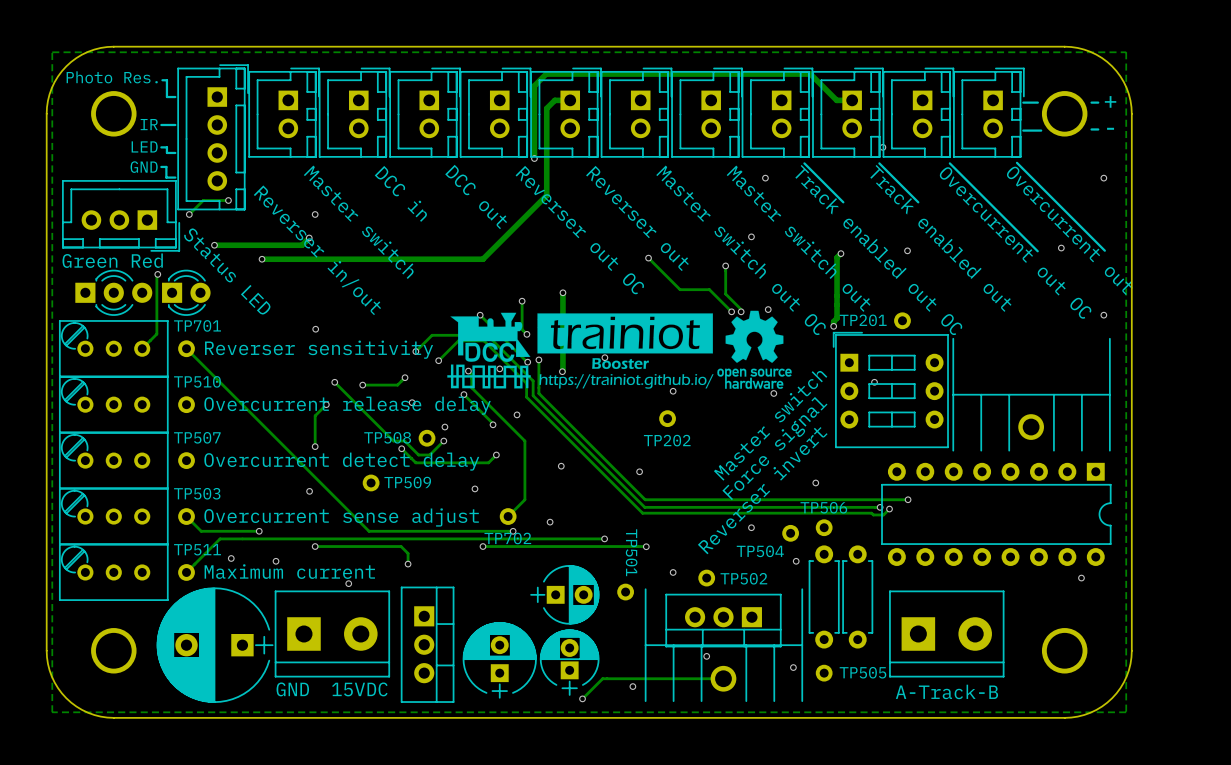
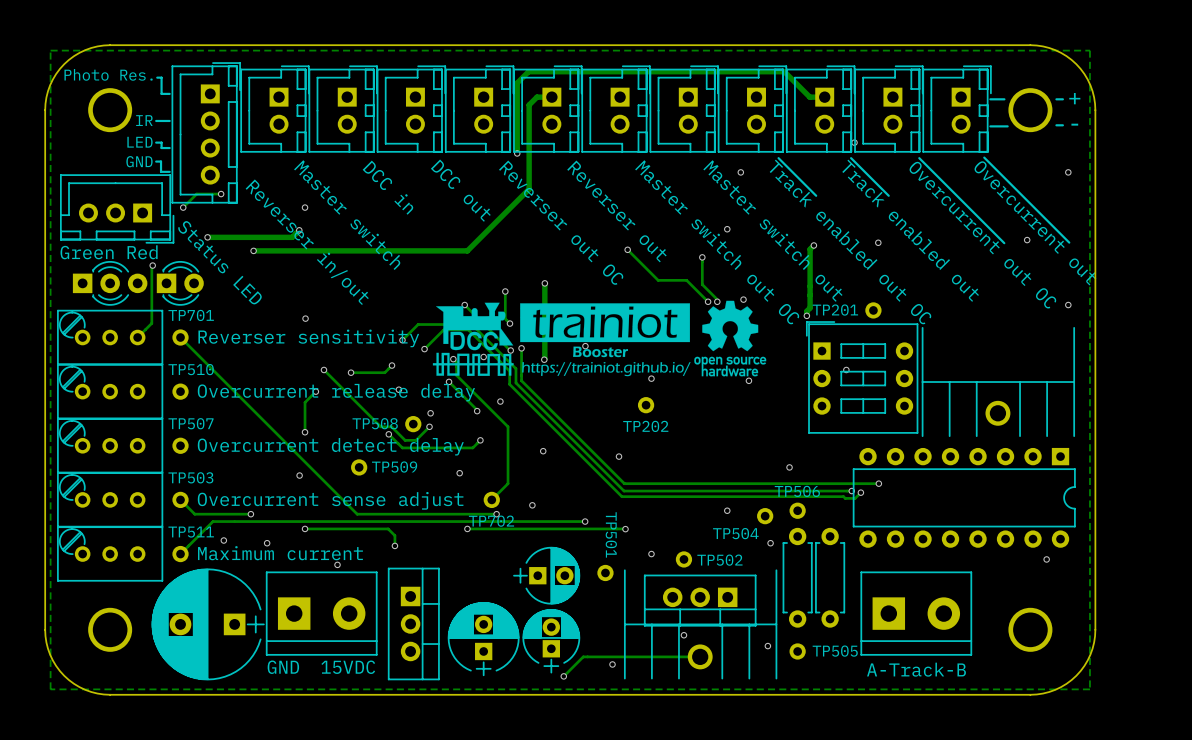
text: Master switch (770, 425) -> none
text: Force signal (774, 448) -> none
text: Reverser invert (762, 490) -> none

